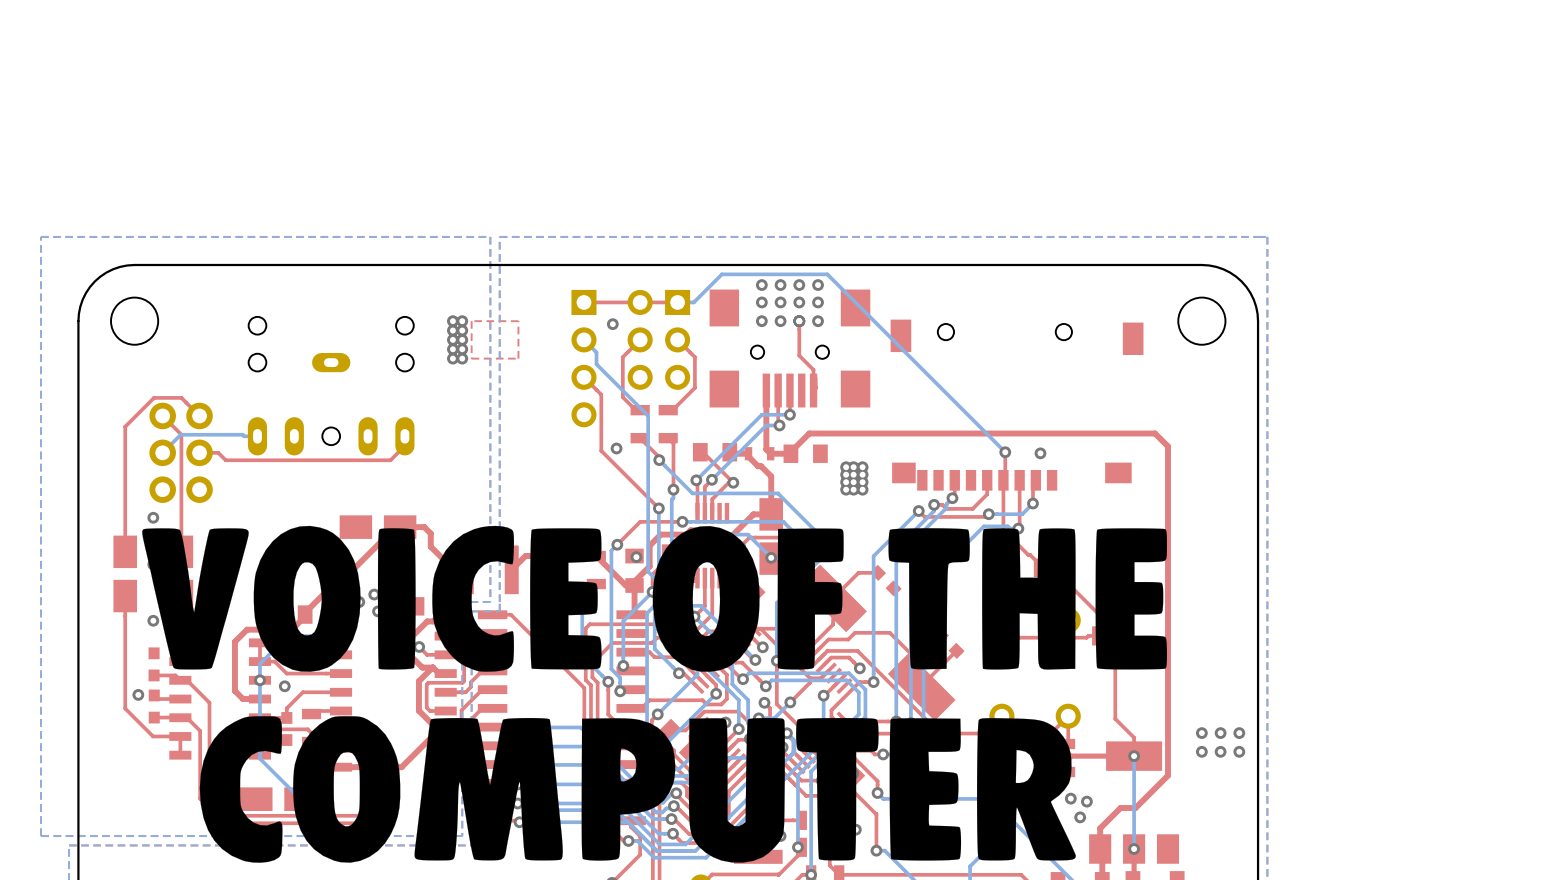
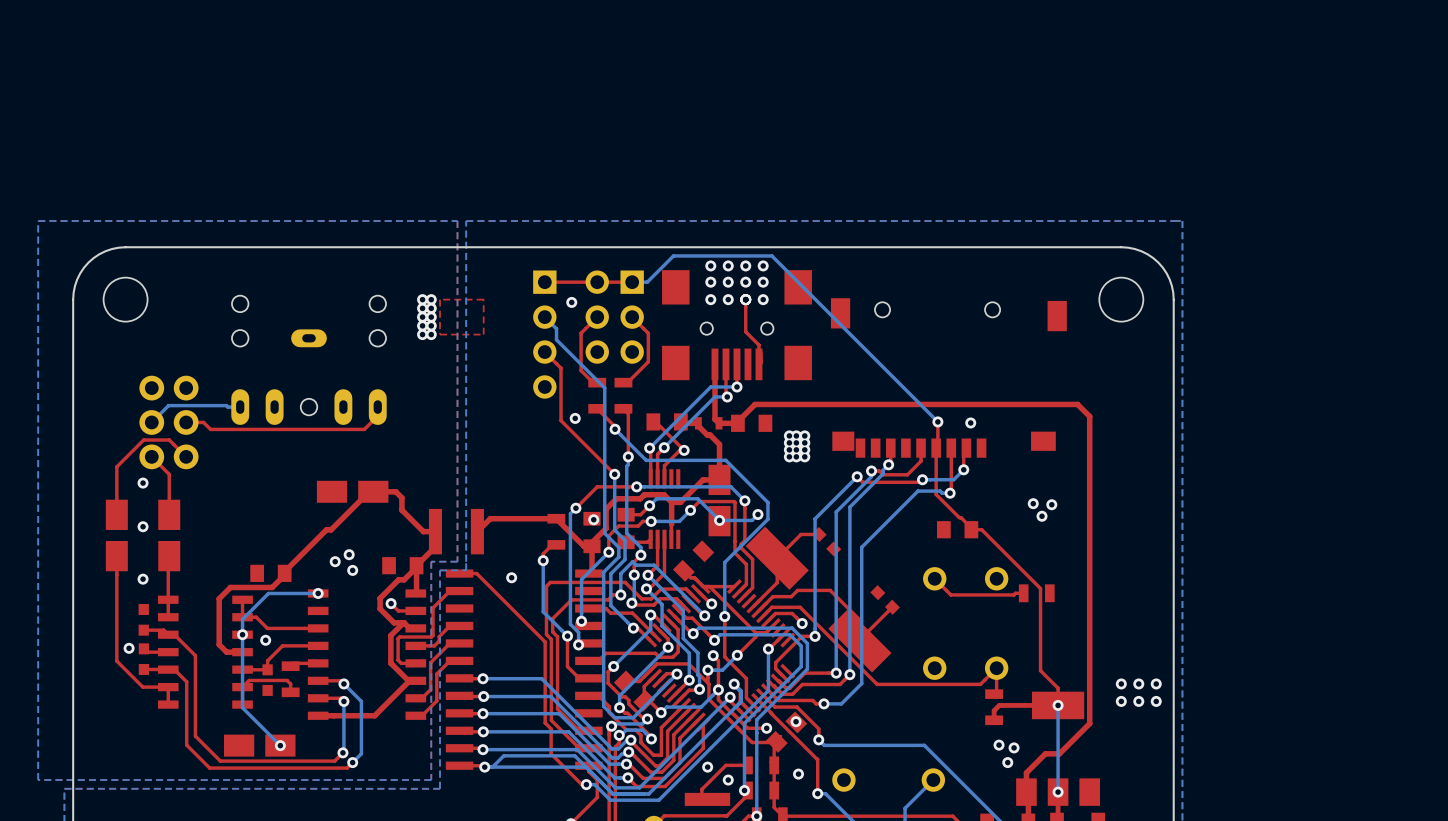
top track: (162, 415) (181, 434) (181, 508) -> (151, 456) (169, 474)
top track: (199, 415) (181, 397) (154, 397) (125, 426) (125, 500) -> (186, 456) (169, 440) (143, 440) (116, 466)
drawing: [142, 525, 1168, 863] -> none

